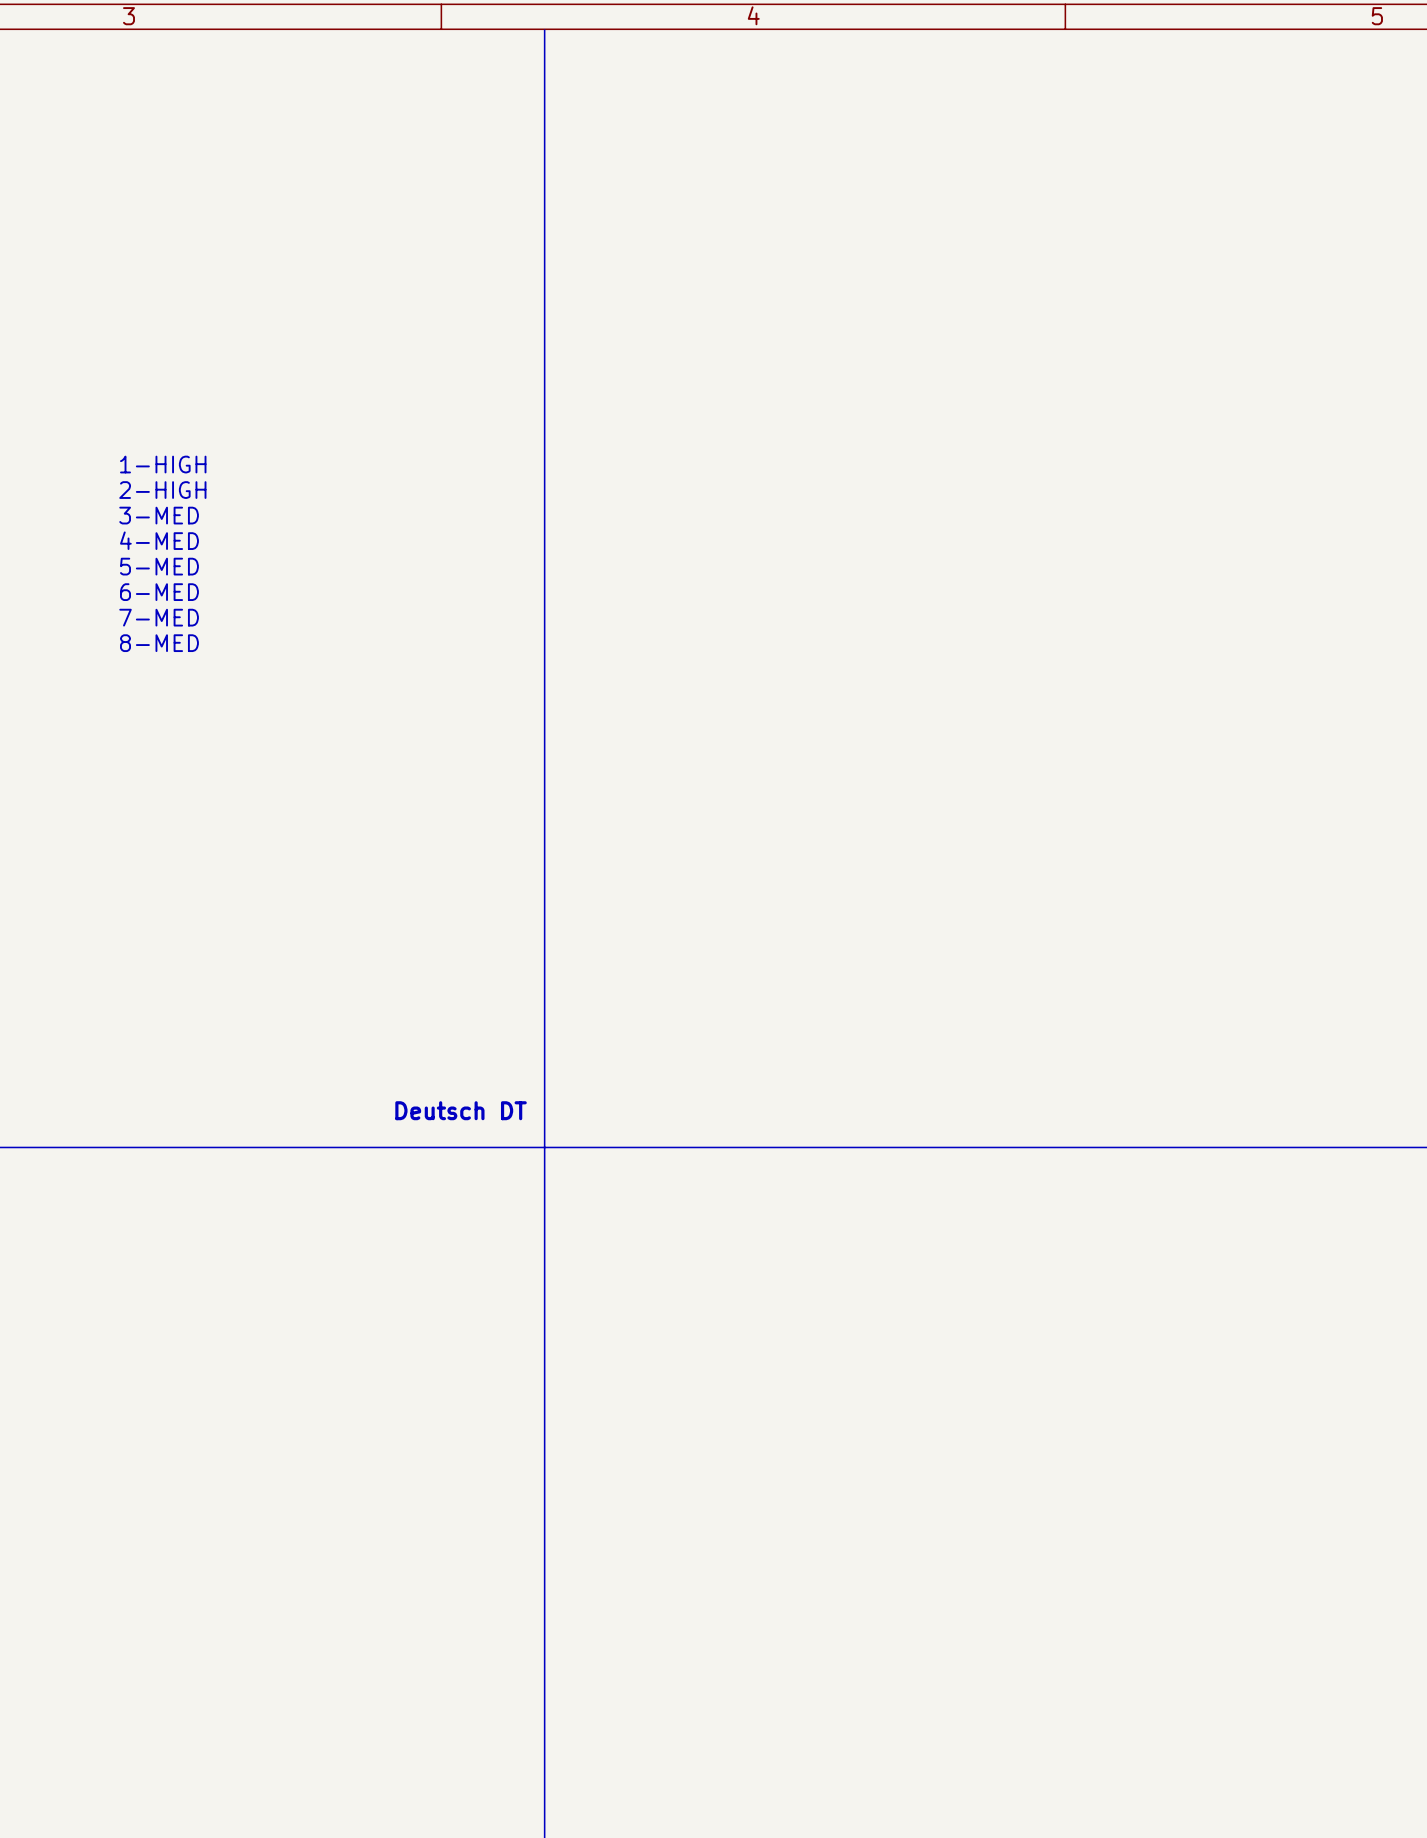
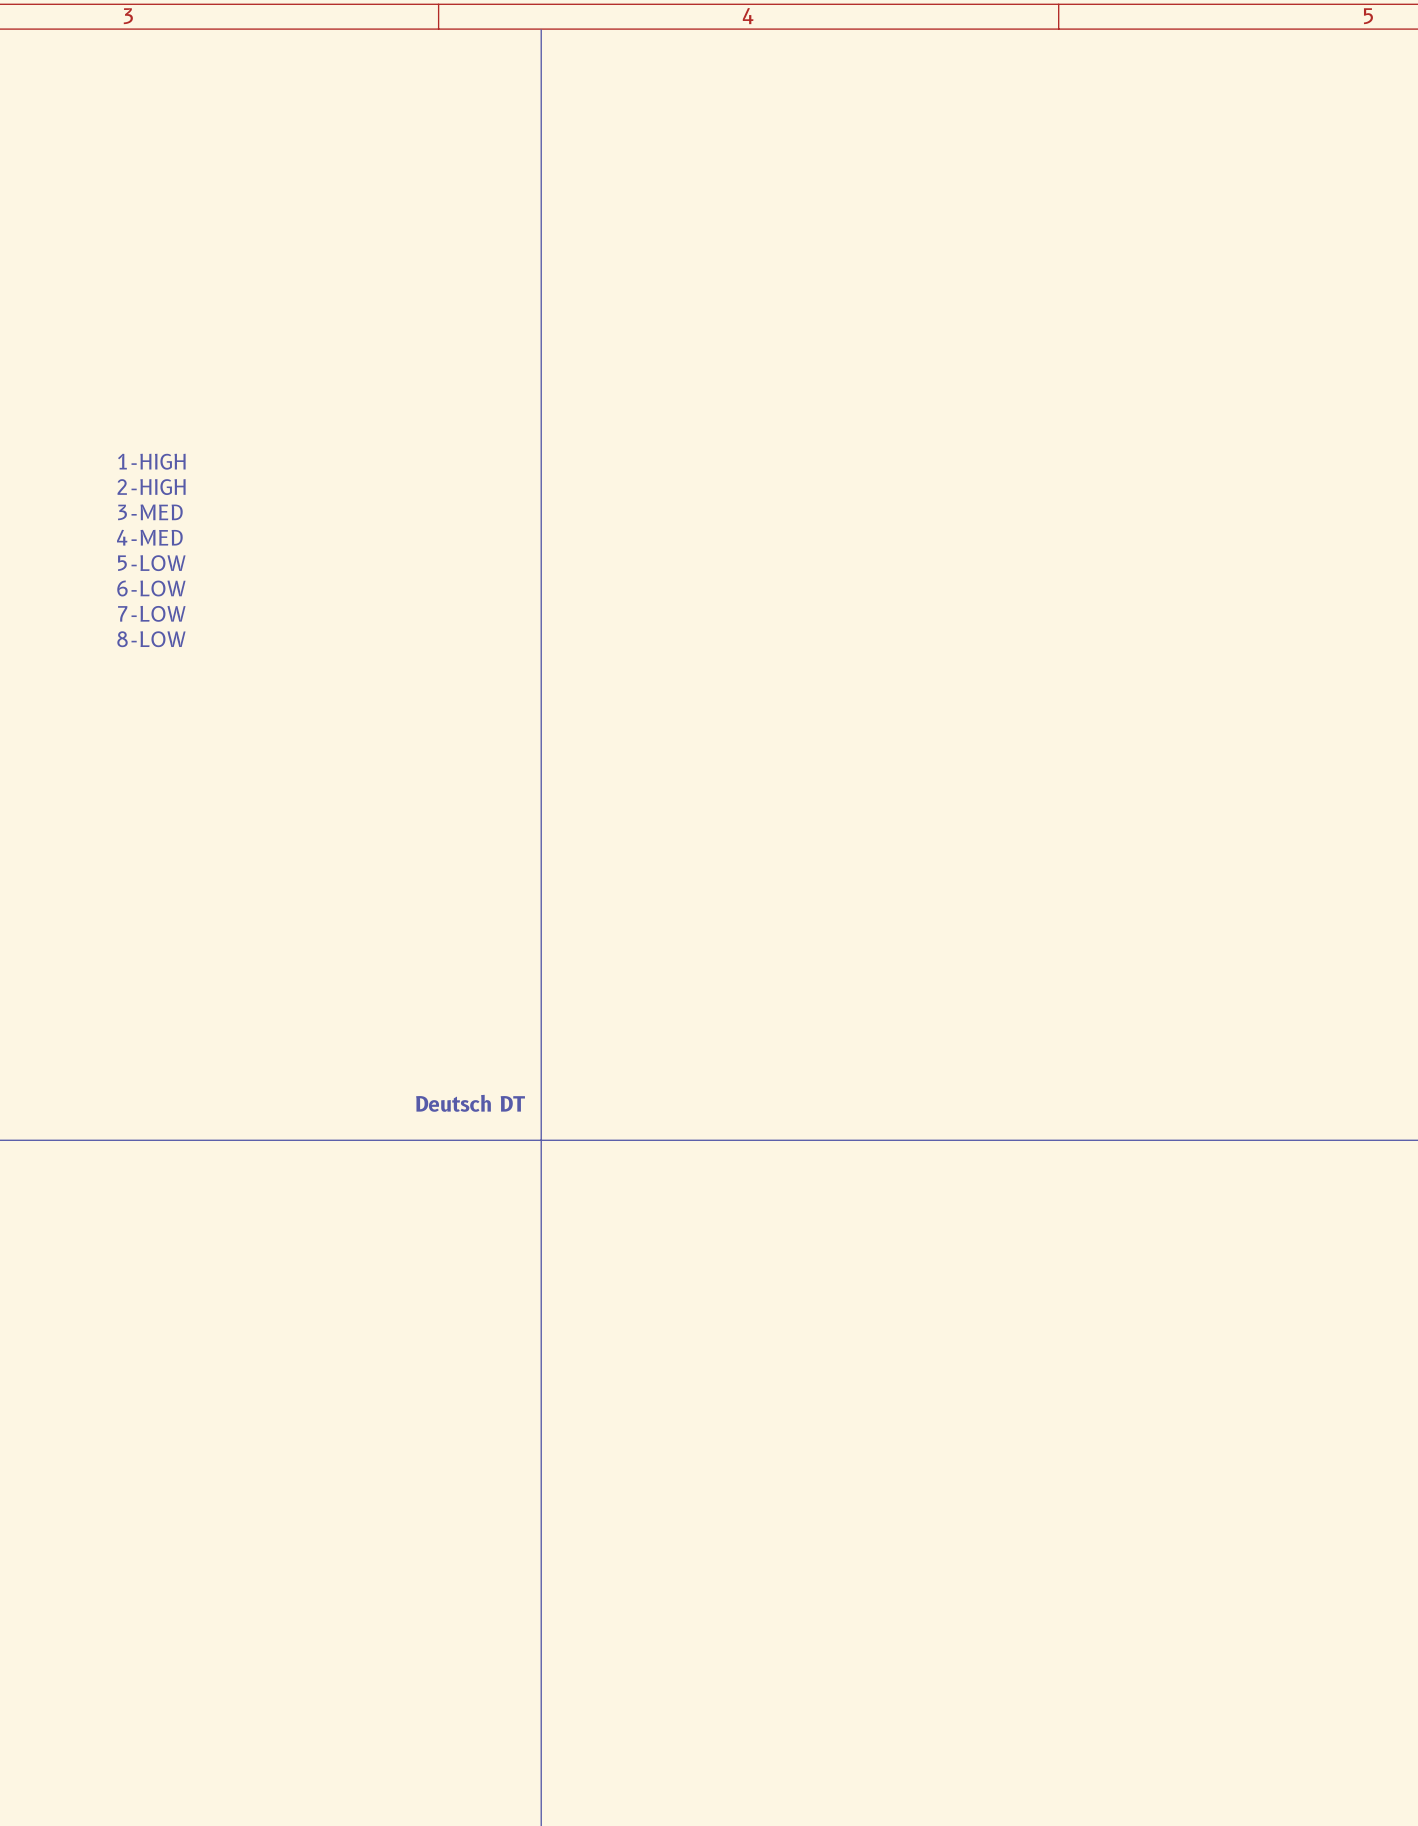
text: 5-MED (159, 566) -> 5-LOW (151, 563)
text: 6-MED (159, 592) -> 6-LOW (151, 588)
text: 7-MED (159, 617) -> 7-LOW (151, 613)
text: 8-MED (159, 643) -> 8-LOW (151, 639)

